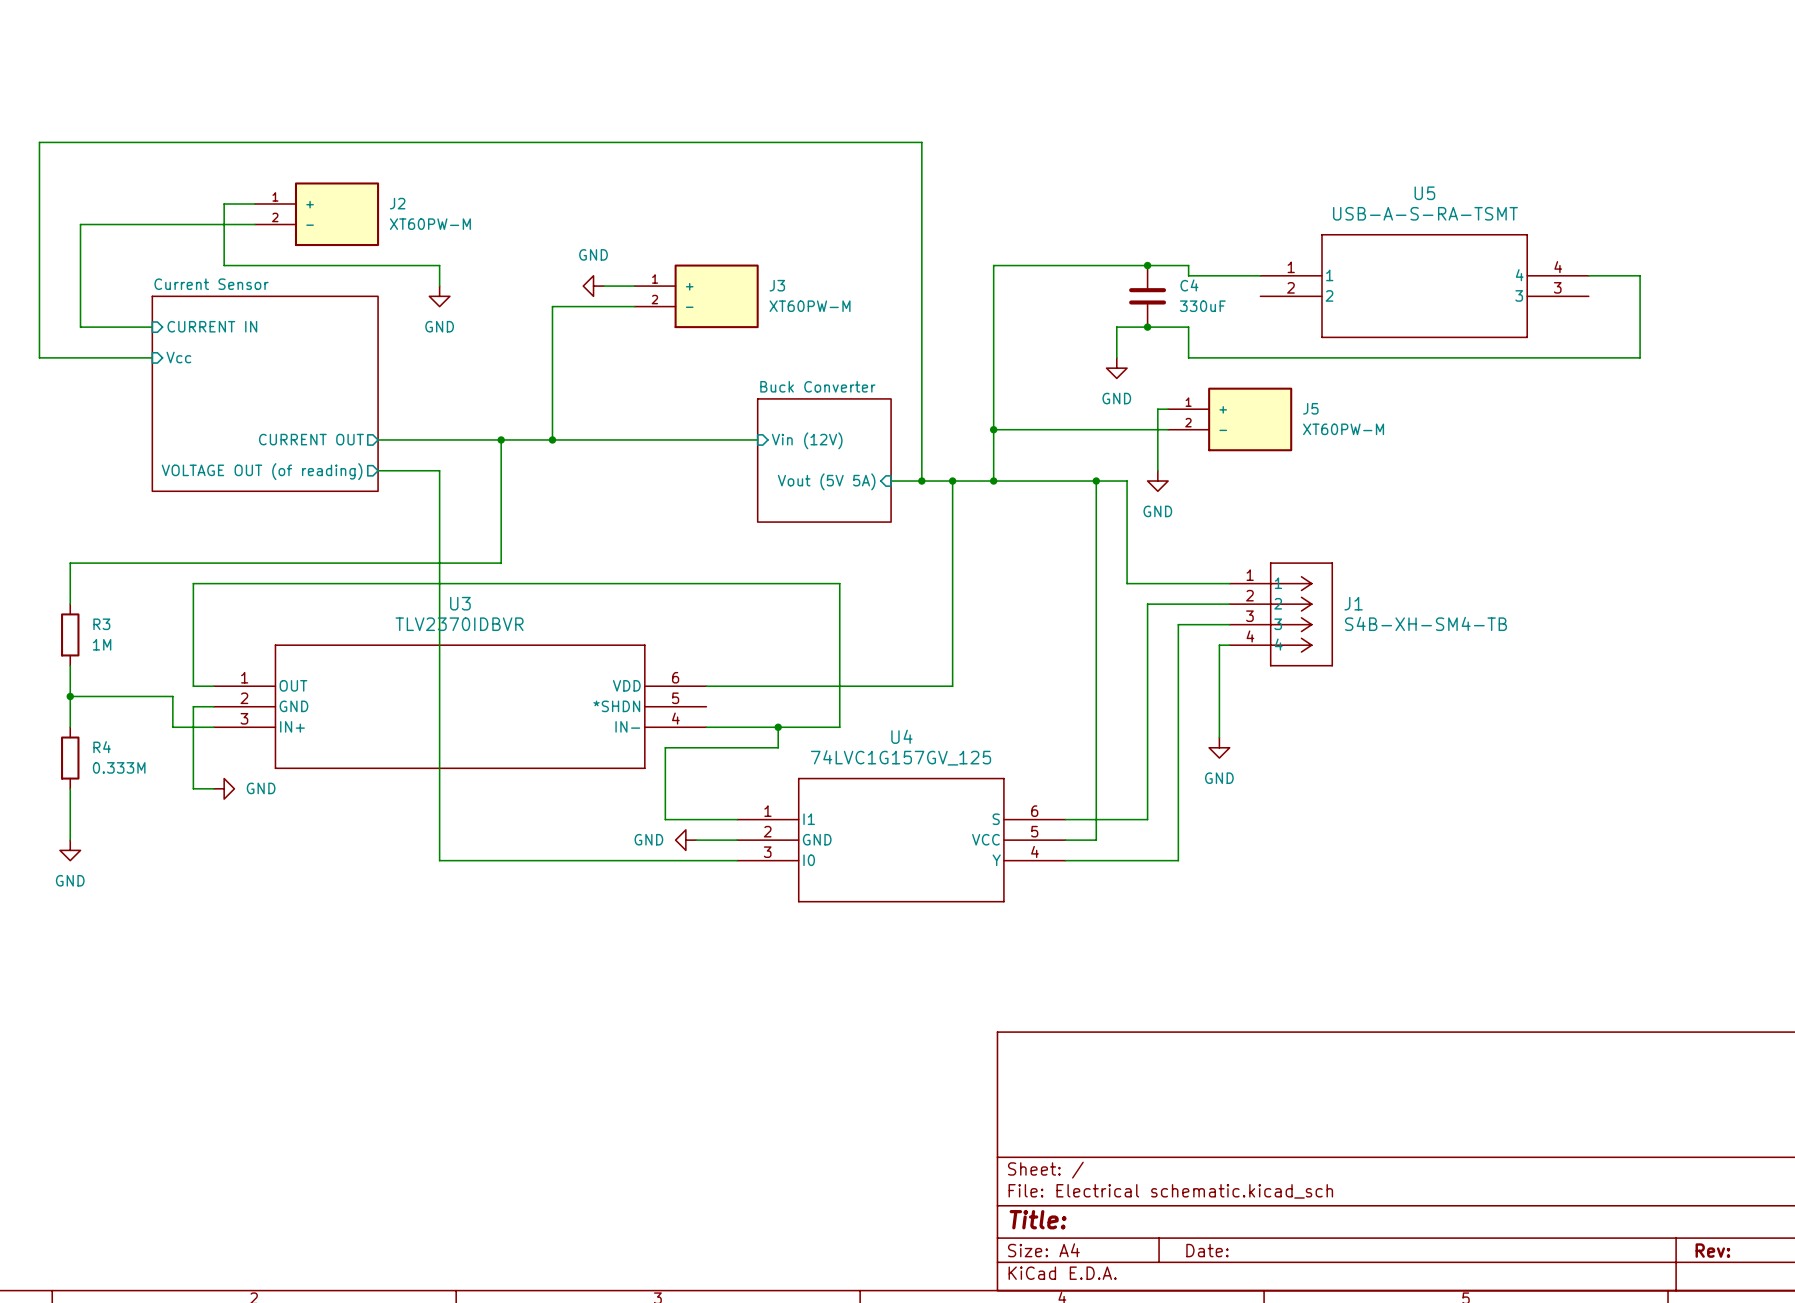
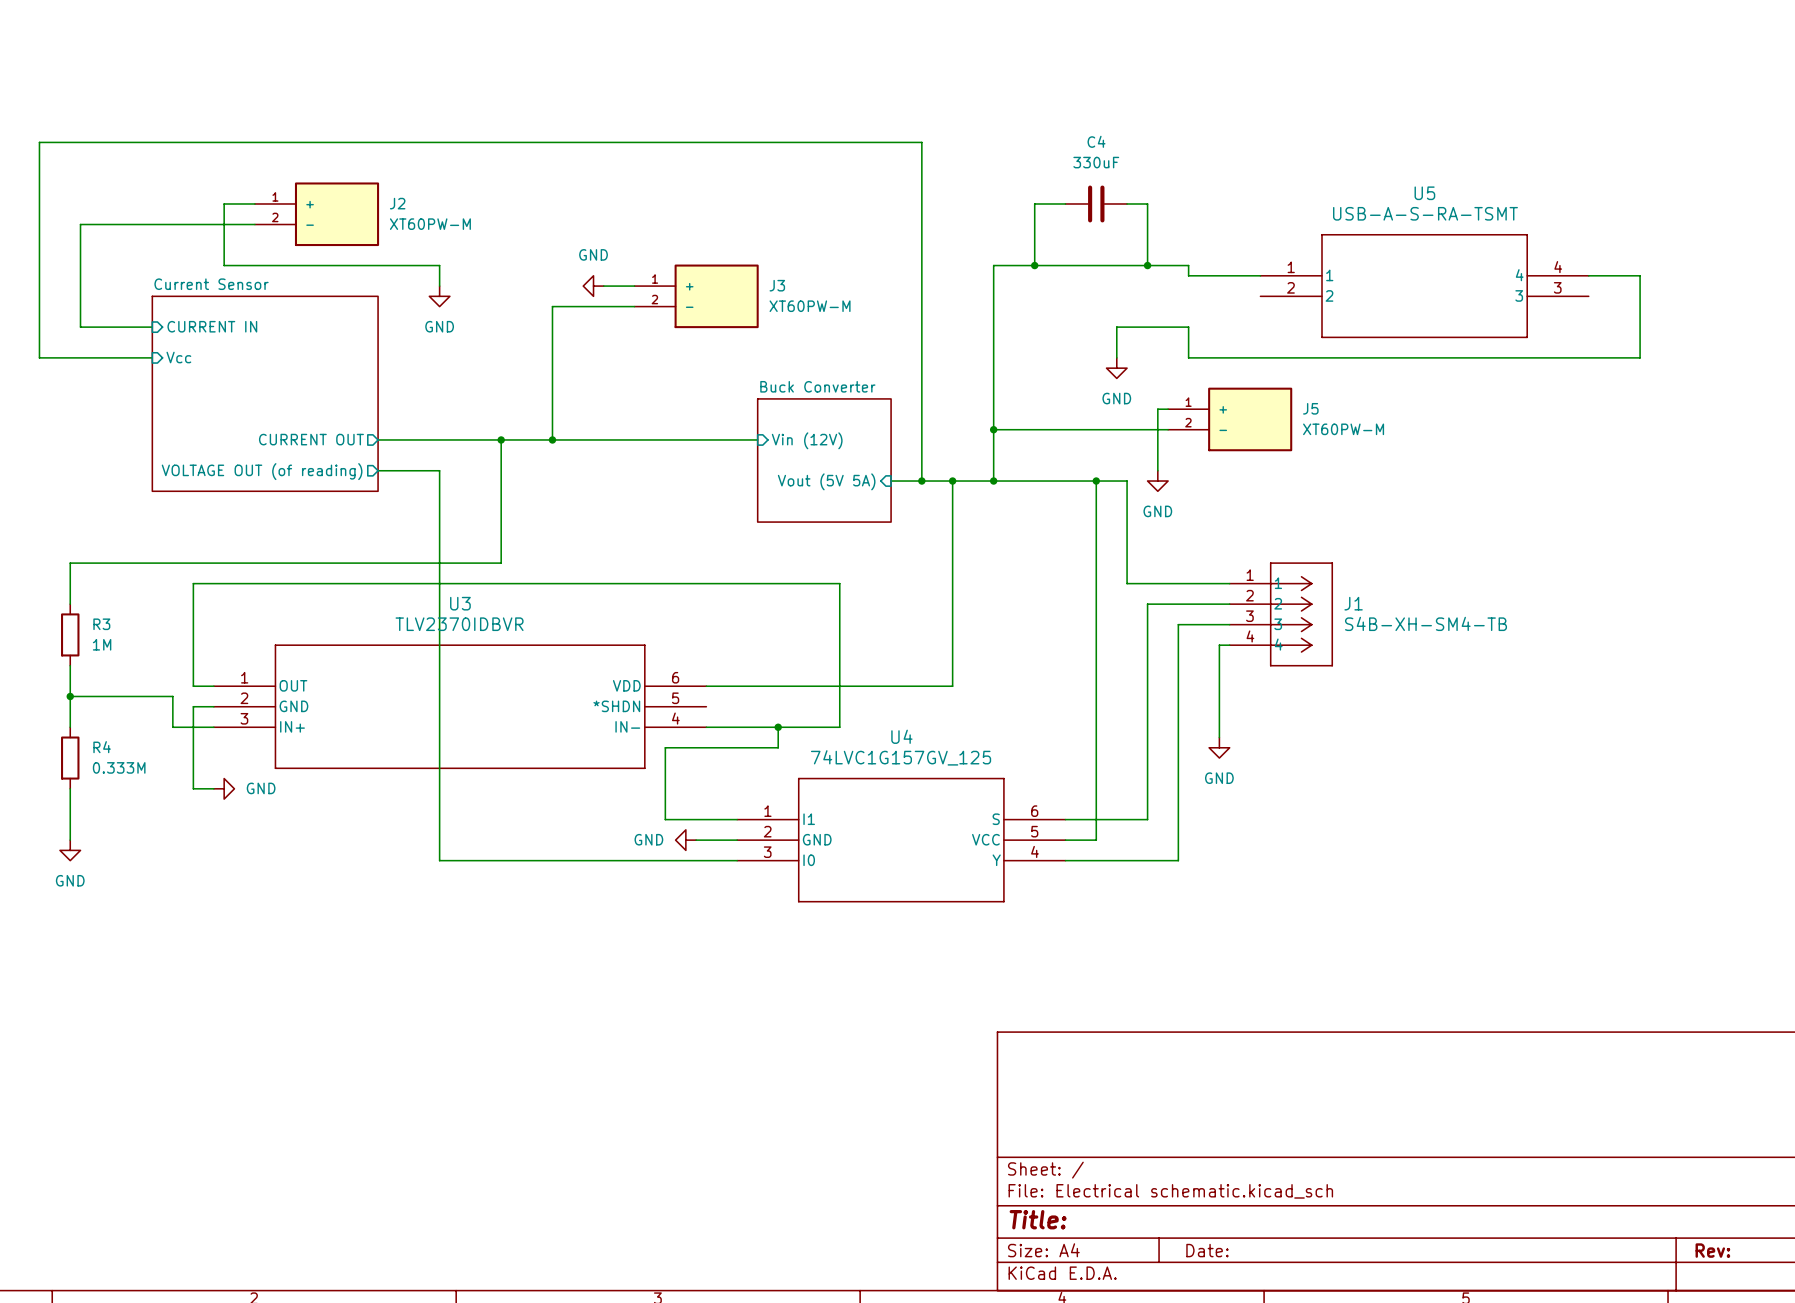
wire: none -> (1065, 203) (1034, 203) (1034, 265)
wire: none -> (1127, 203) (1147, 203) (1147, 265)
junction: none -> (1034, 265)
C4 name position: C4 (1189, 285) -> C4 (1096, 141)
C4 rotation: 0° (1147, 296) -> 90° clockwise (1096, 203)
C4 position: (1147, 296) -> (1096, 203)
C4 value position: 330uF (1202, 306) -> 330uF (1096, 162)
junction: (1147, 327) -> none

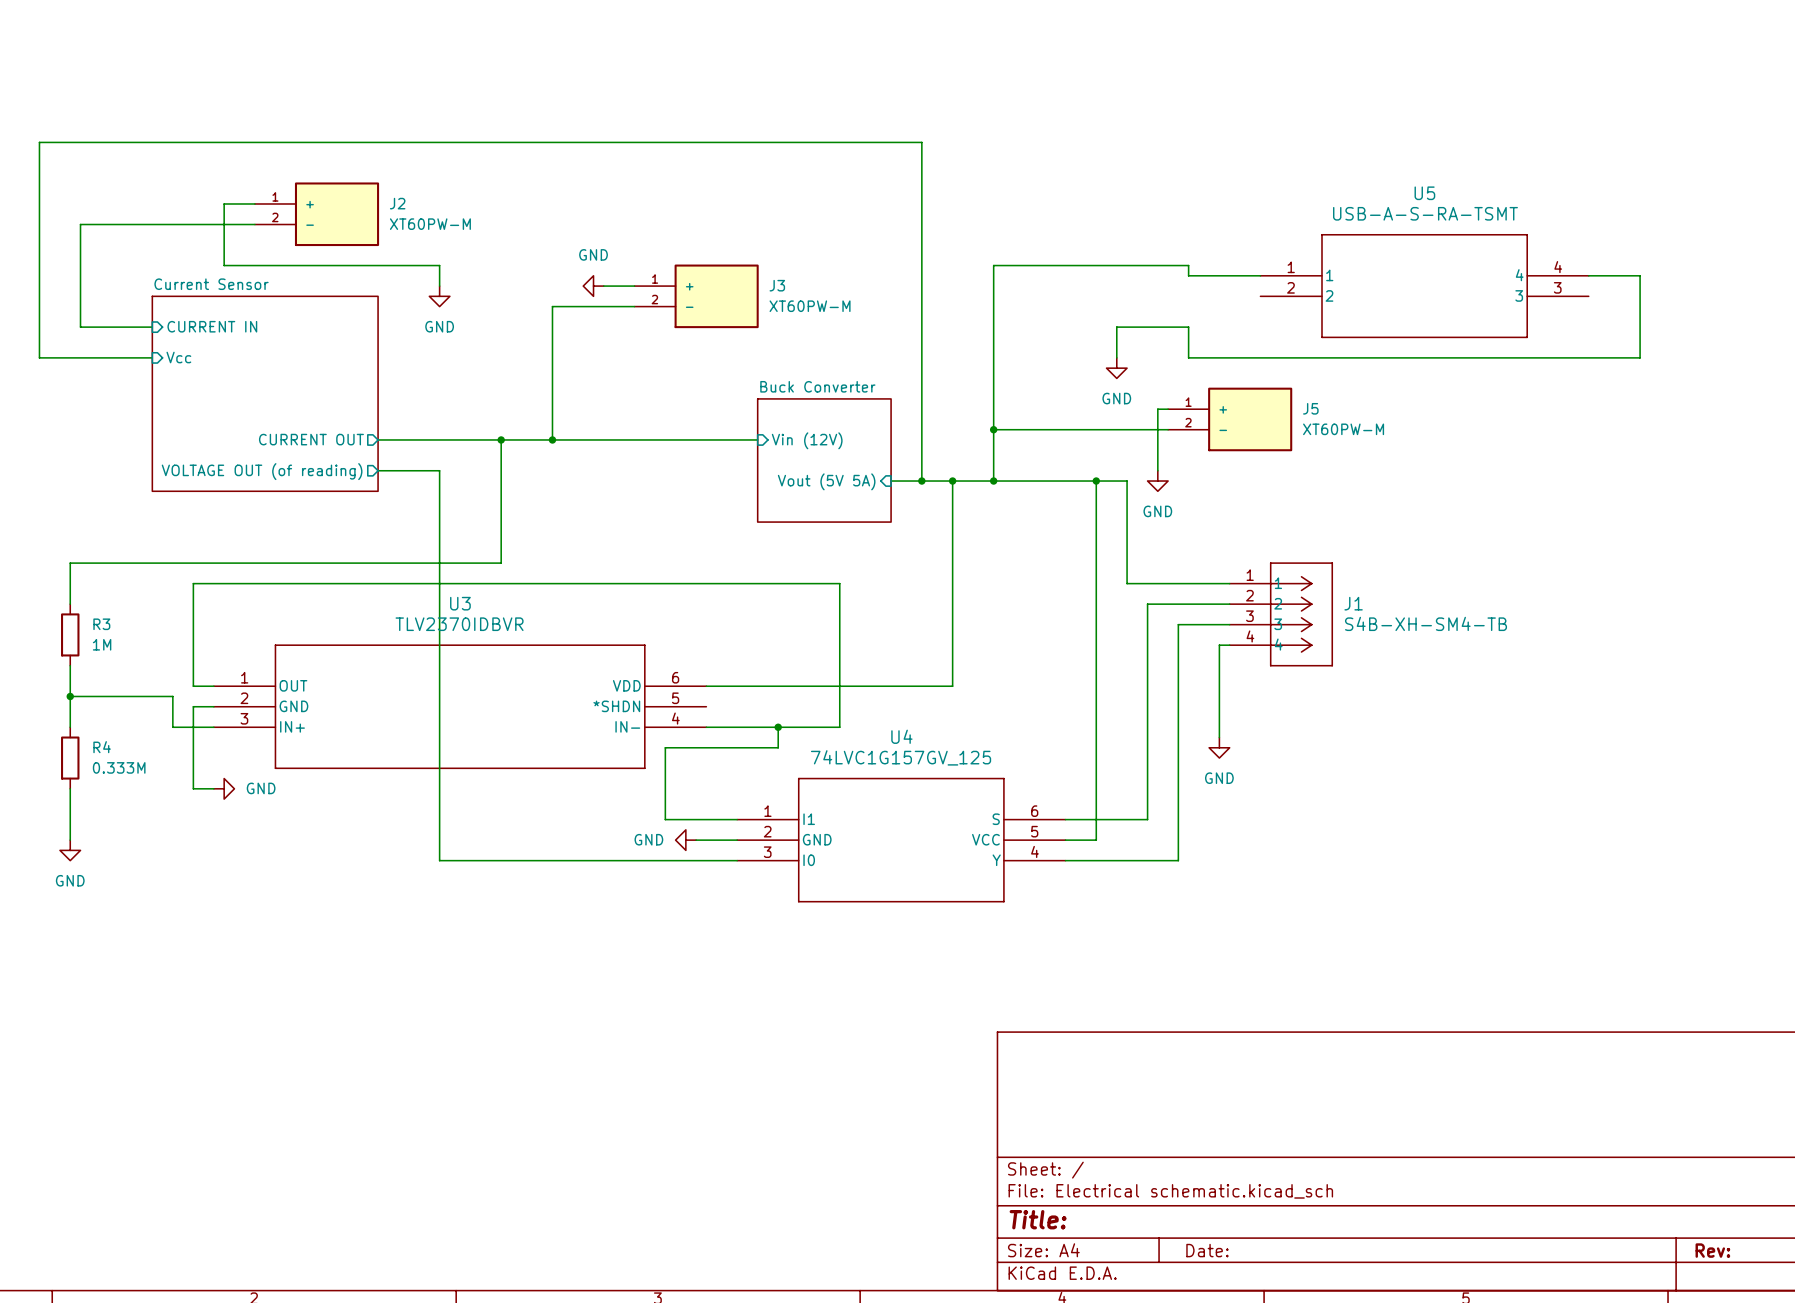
wire: (1065, 203) (1034, 203) (1034, 265) -> none
C4: 330uF (1096, 203) -> none
wire: (1127, 203) (1147, 203) (1147, 265) -> none
junction: (1034, 265) -> none
junction: (1147, 265) -> none

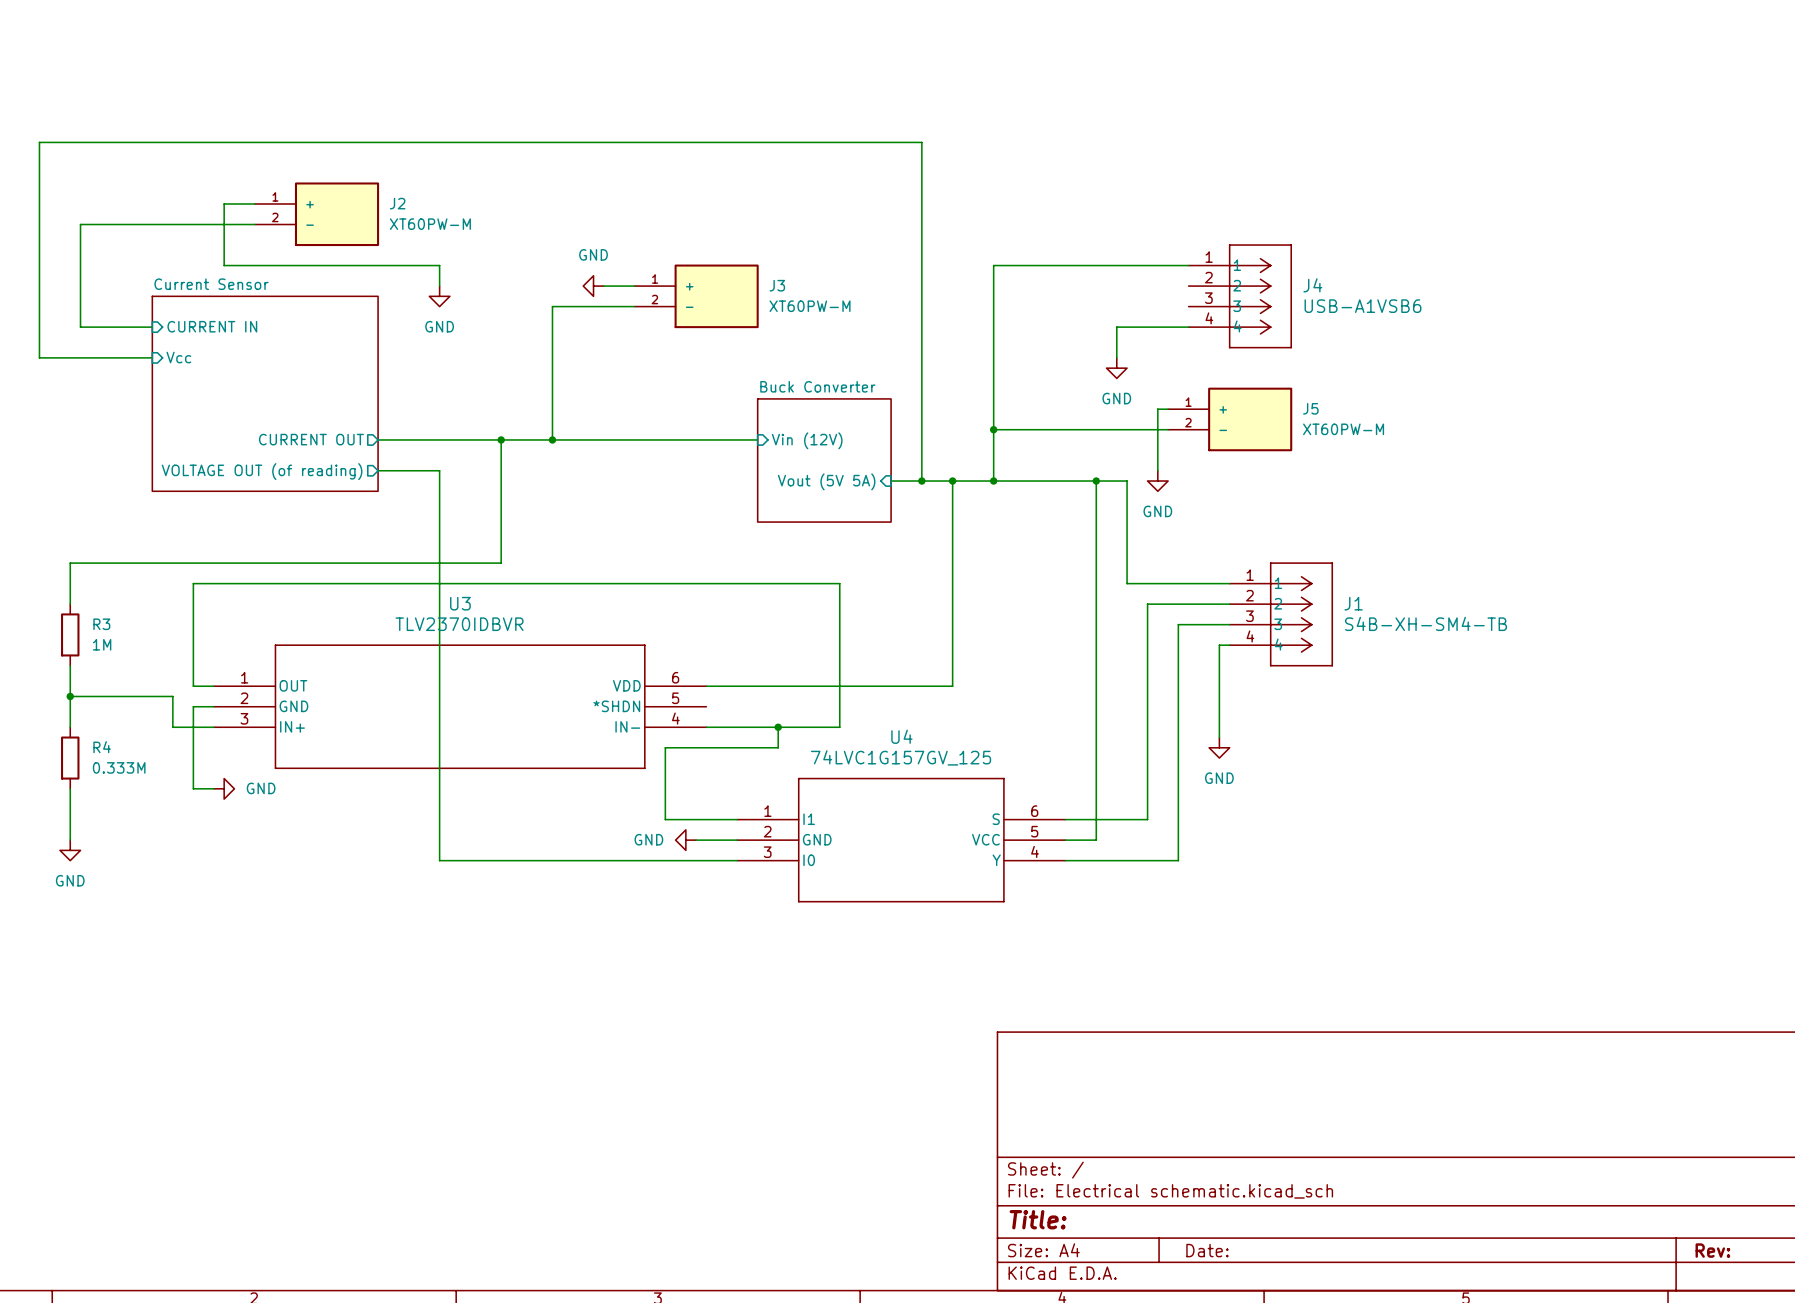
wire: (1188, 265) (1188, 275) (1260, 275) -> none
wire: (1588, 275) (1640, 275) (1640, 357) (1188, 357) (1188, 327) -> none
U5: USB-A-S-RA-TSMT (1424, 286) -> none
J4: none -> USB-A1VSB6 (1240, 296)

